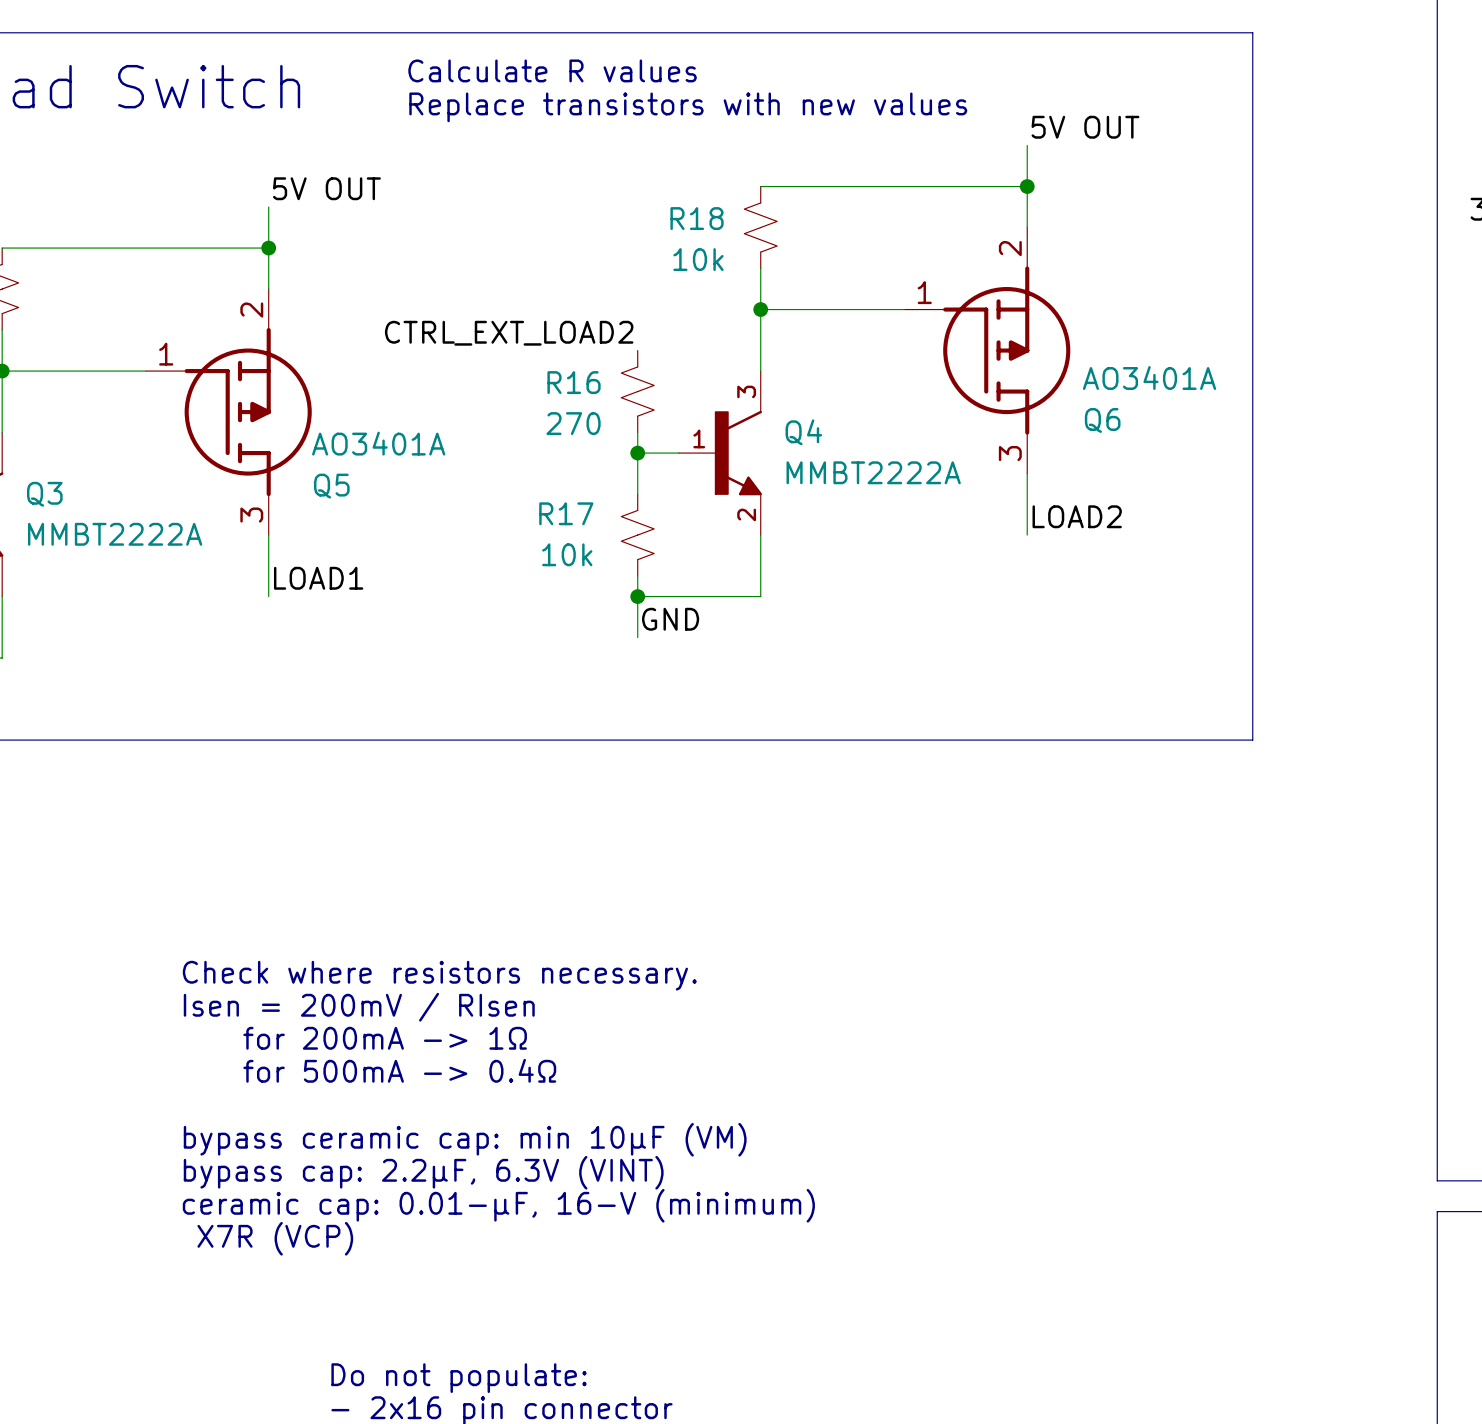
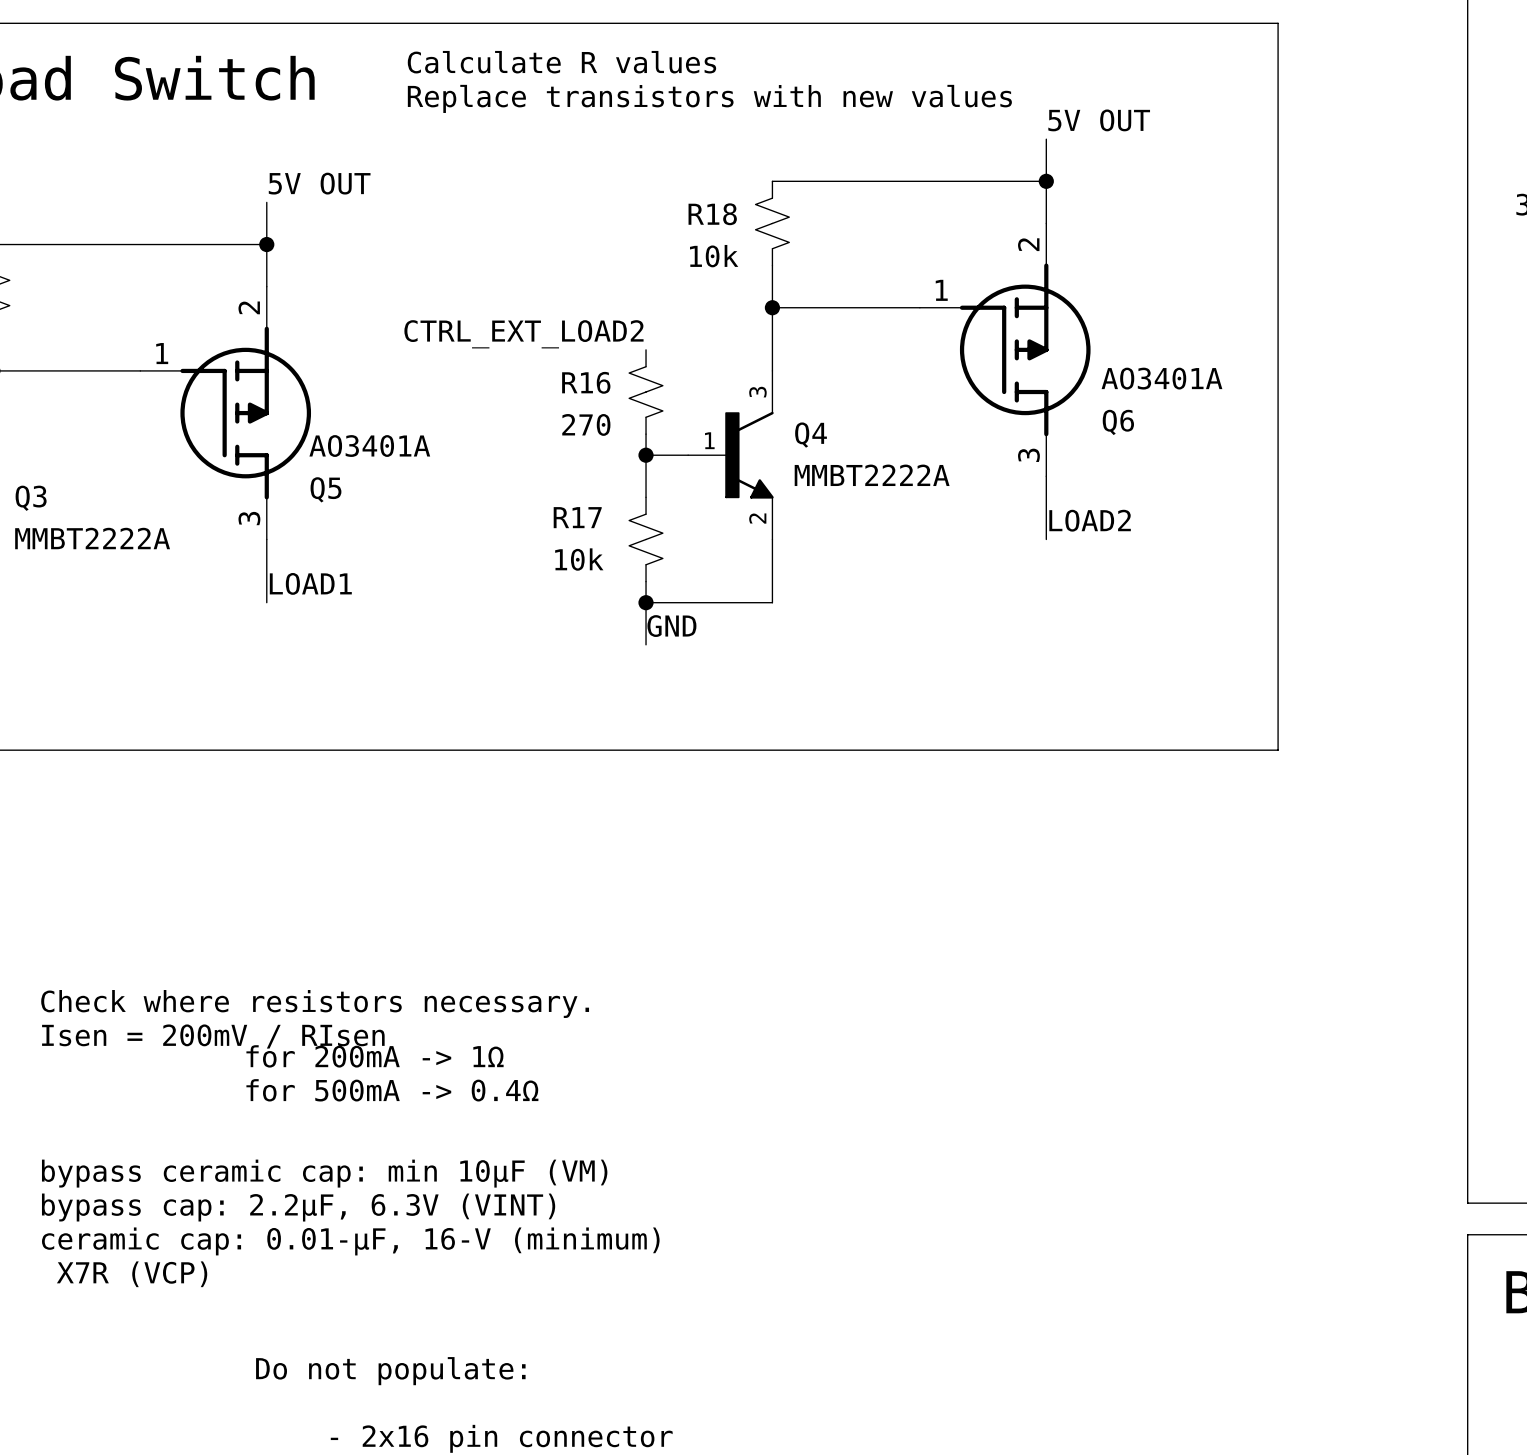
text position: Check where resistors necessary. (439, 975) -> Check where resistors necessary. (315, 1003)
text position: Isen = 200mV / RIsen (359, 1007) -> Isen = 200mV / RIsen (213, 1036)
text position: bypass ceramic cap: min 10µF (VM) (465, 1139) -> bypass ceramic cap: min 10µF (VM) (324, 1173)
text position: bypass cap: 2.2µF, 6.3V (VINT) (423, 1172) -> bypass cap: 2.2µF, 6.3V (VINT) (298, 1207)
text position: ceramic cap: 0.01-μF, 16-V (minimum) (498, 1205) -> ceramic cap: 0.01-μF, 16-V (minimum) (350, 1241)
text position: X7R (VCP) (275, 1238) -> X7R (VCP) (132, 1274)
text position: Do not populate: (459, 1378) -> Do not populate: (390, 1371)

